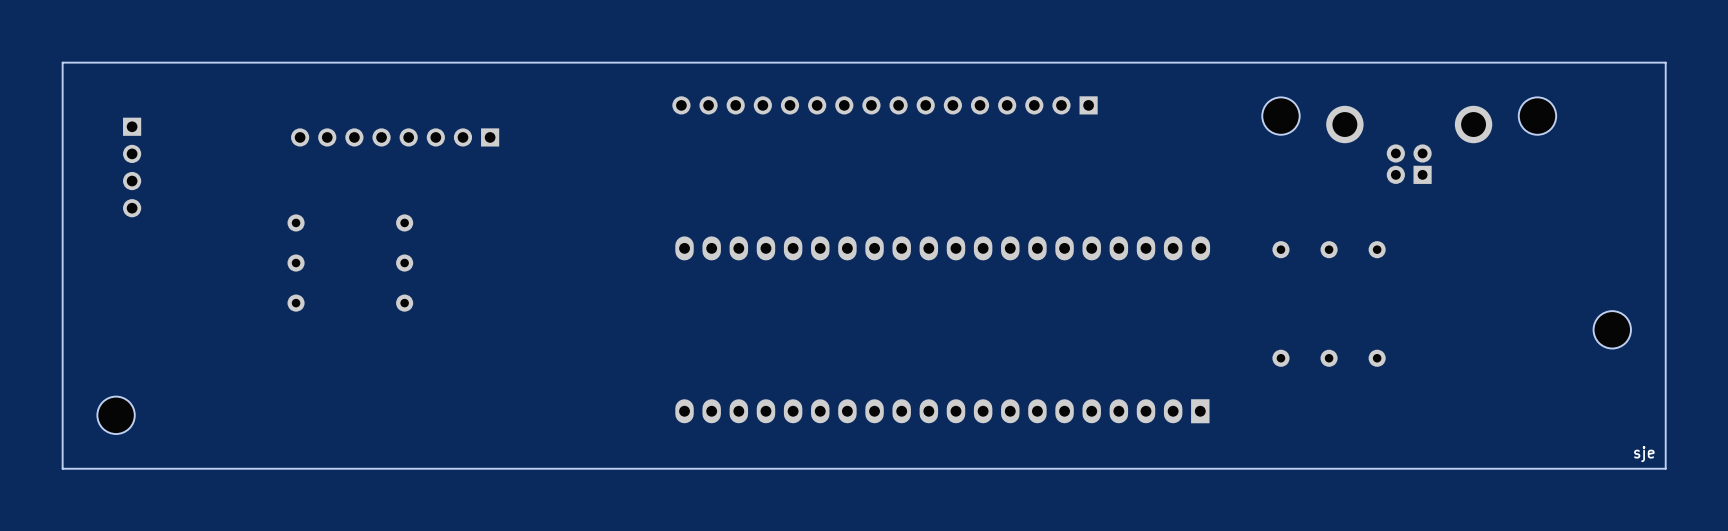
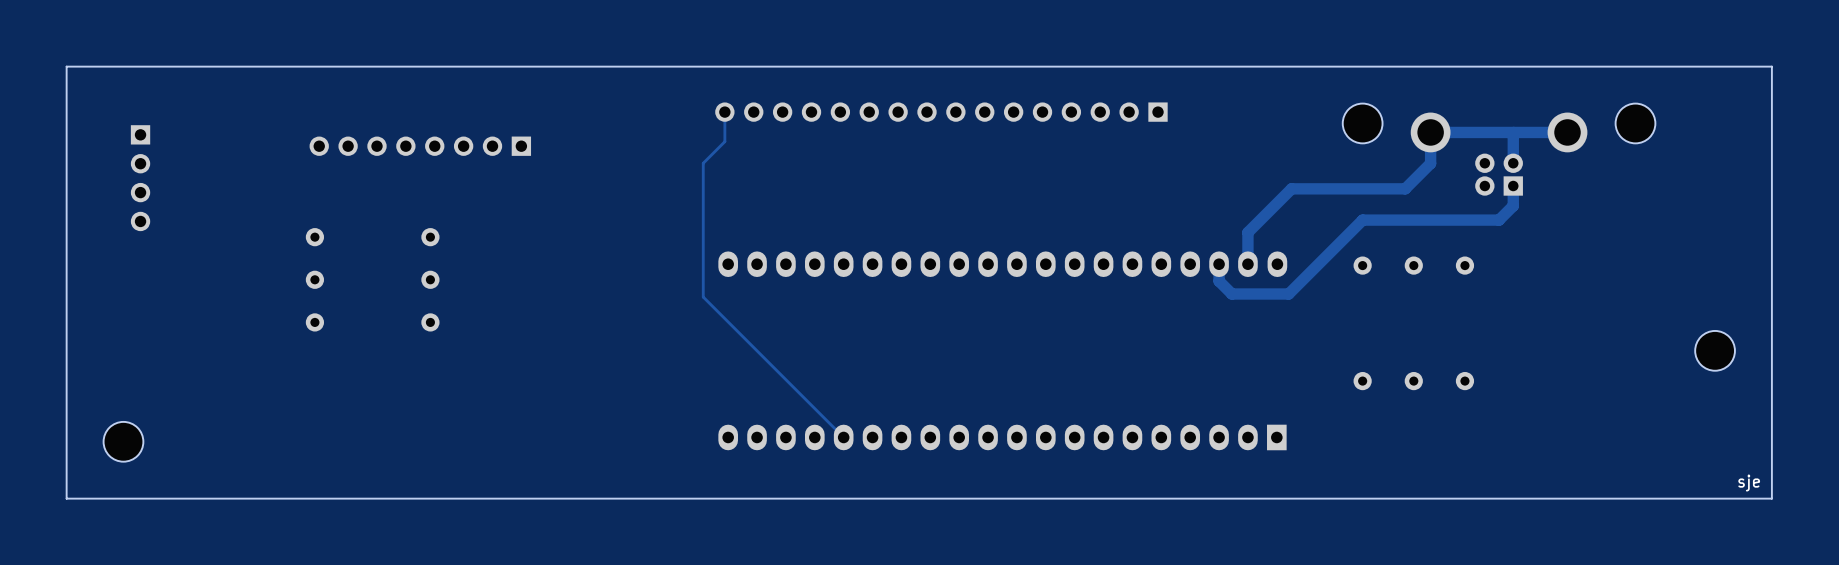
track: none -> (724, 112) (724, 141) (703, 163) (703, 297) (843, 437)
track: none -> (1513, 132) (1513, 163)
track: none -> (1567, 132) (1430, 132) (1430, 163) (1405, 188) (1291, 188) (1247, 232) (1247, 264)
track: none -> (1513, 186) (1513, 205) (1499, 220) (1362, 220) (1288, 294) (1231, 294) (1219, 281) (1219, 264)

